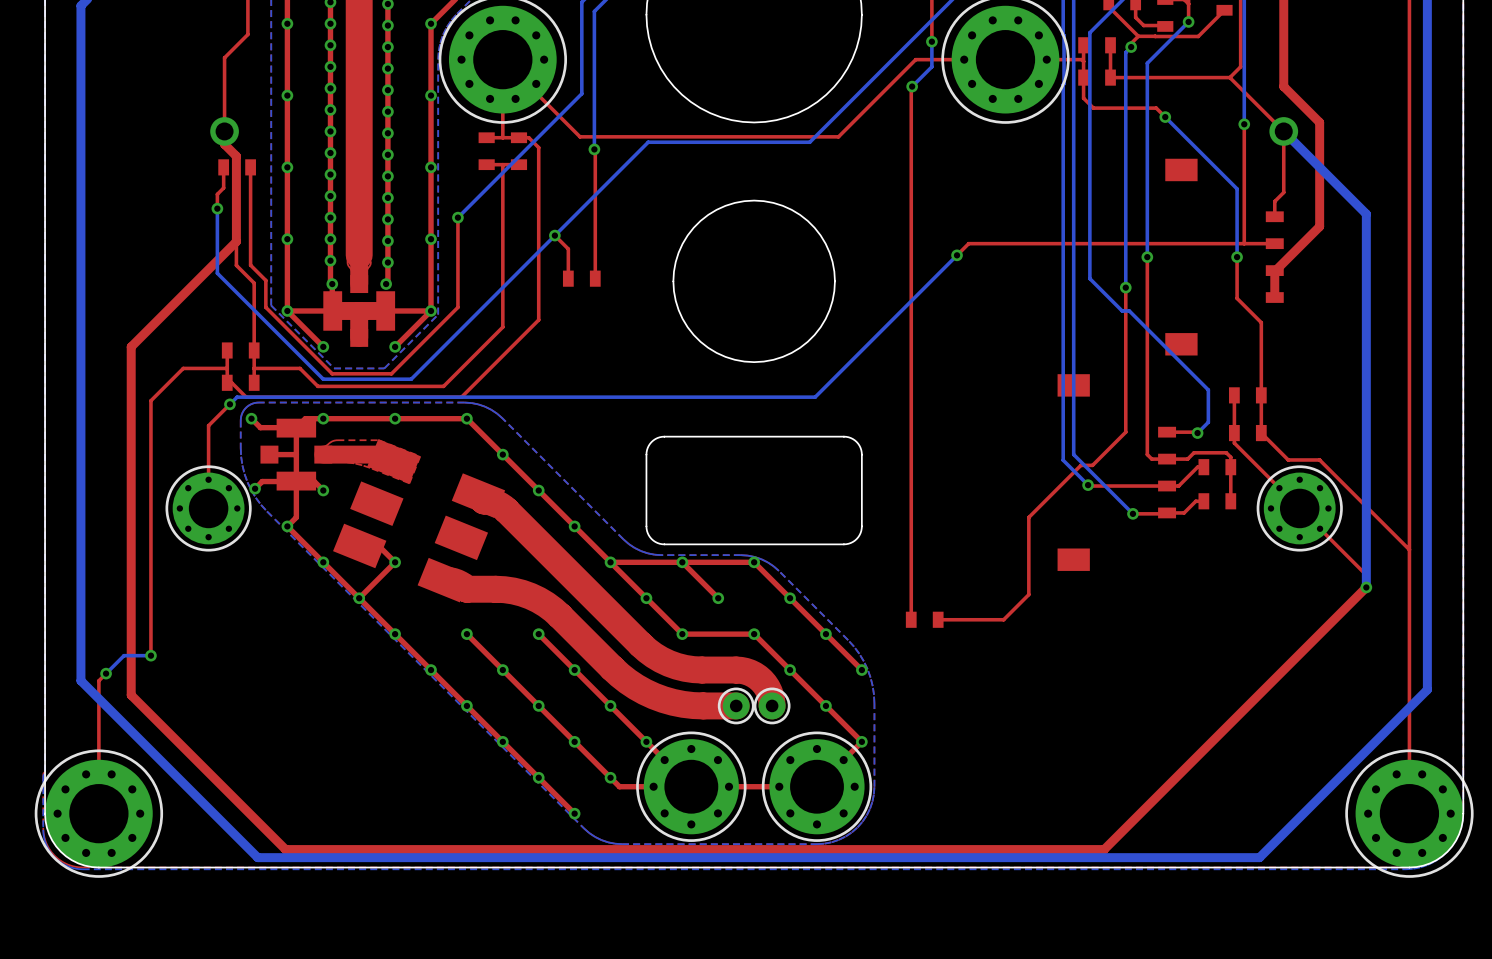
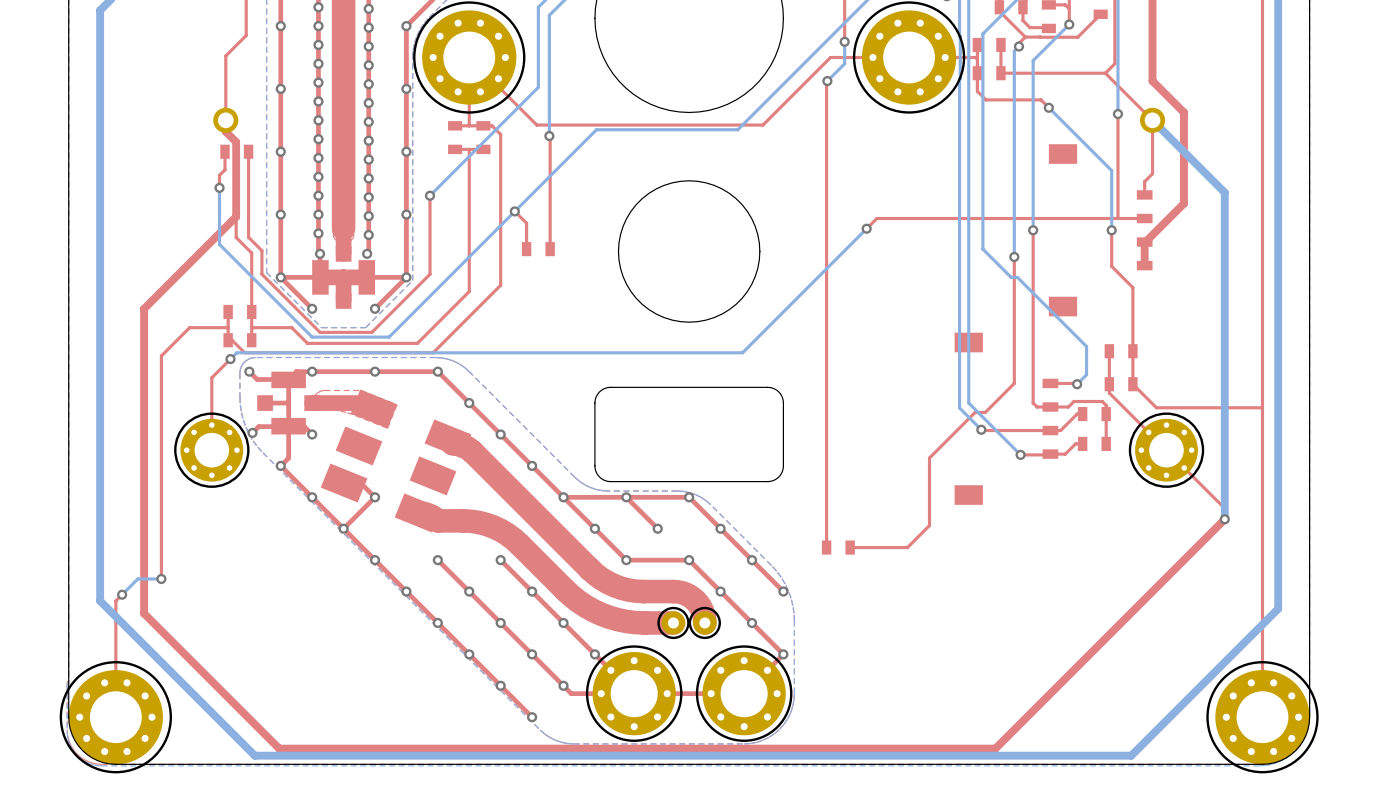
top track: (1319, 459) (1409, 549) -> (1183, 407) (1262, 407)

